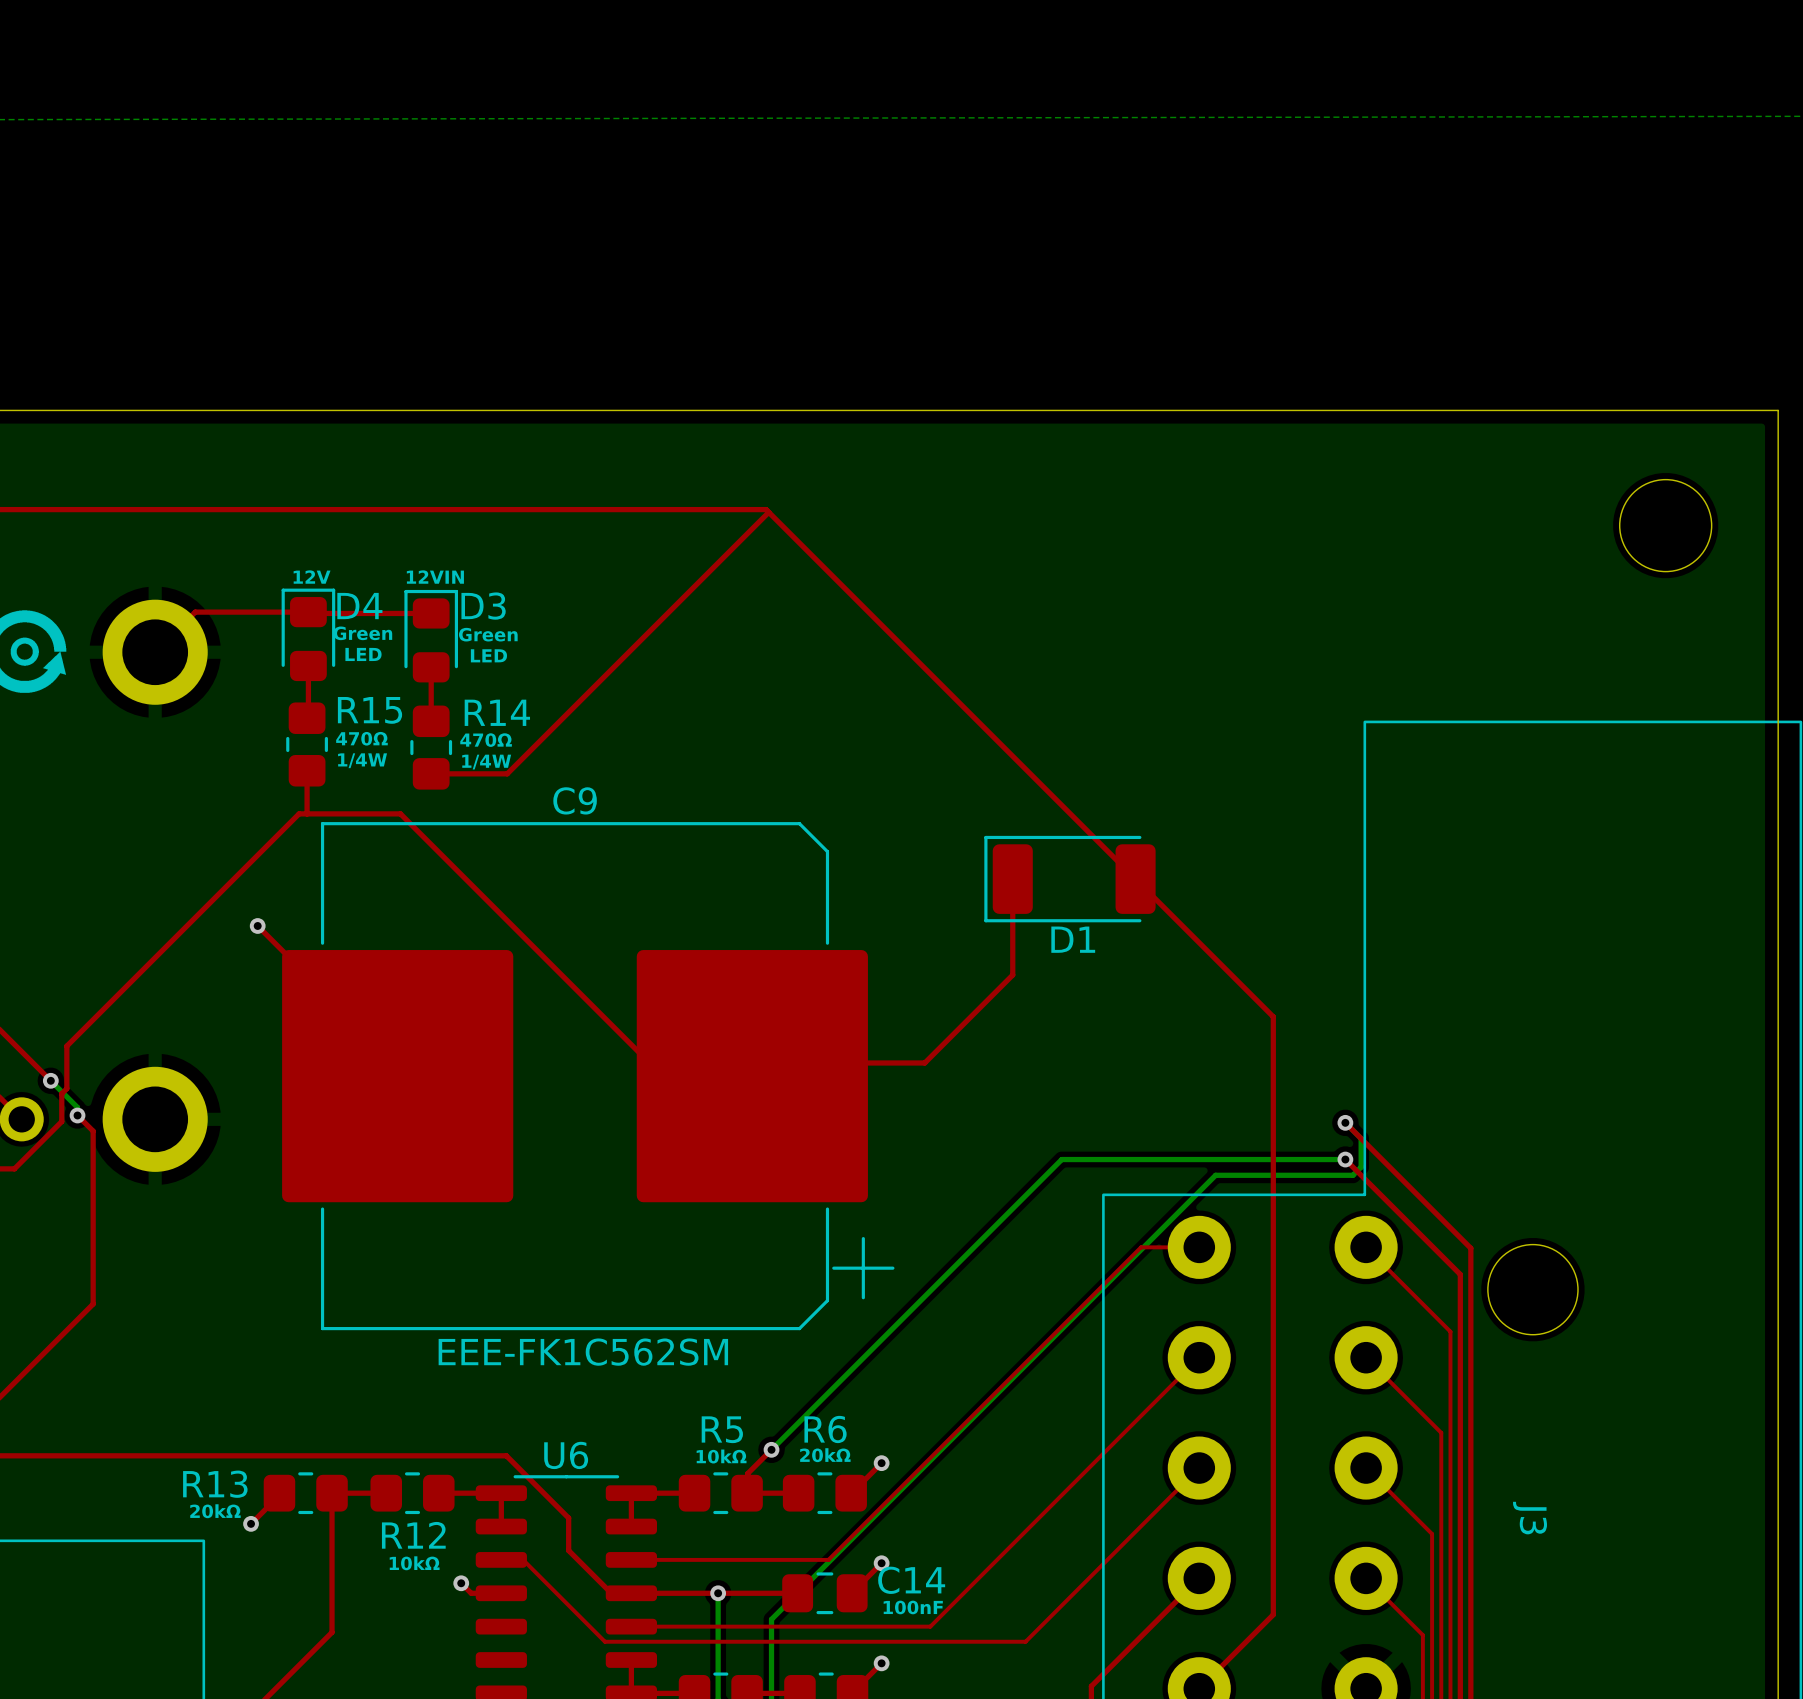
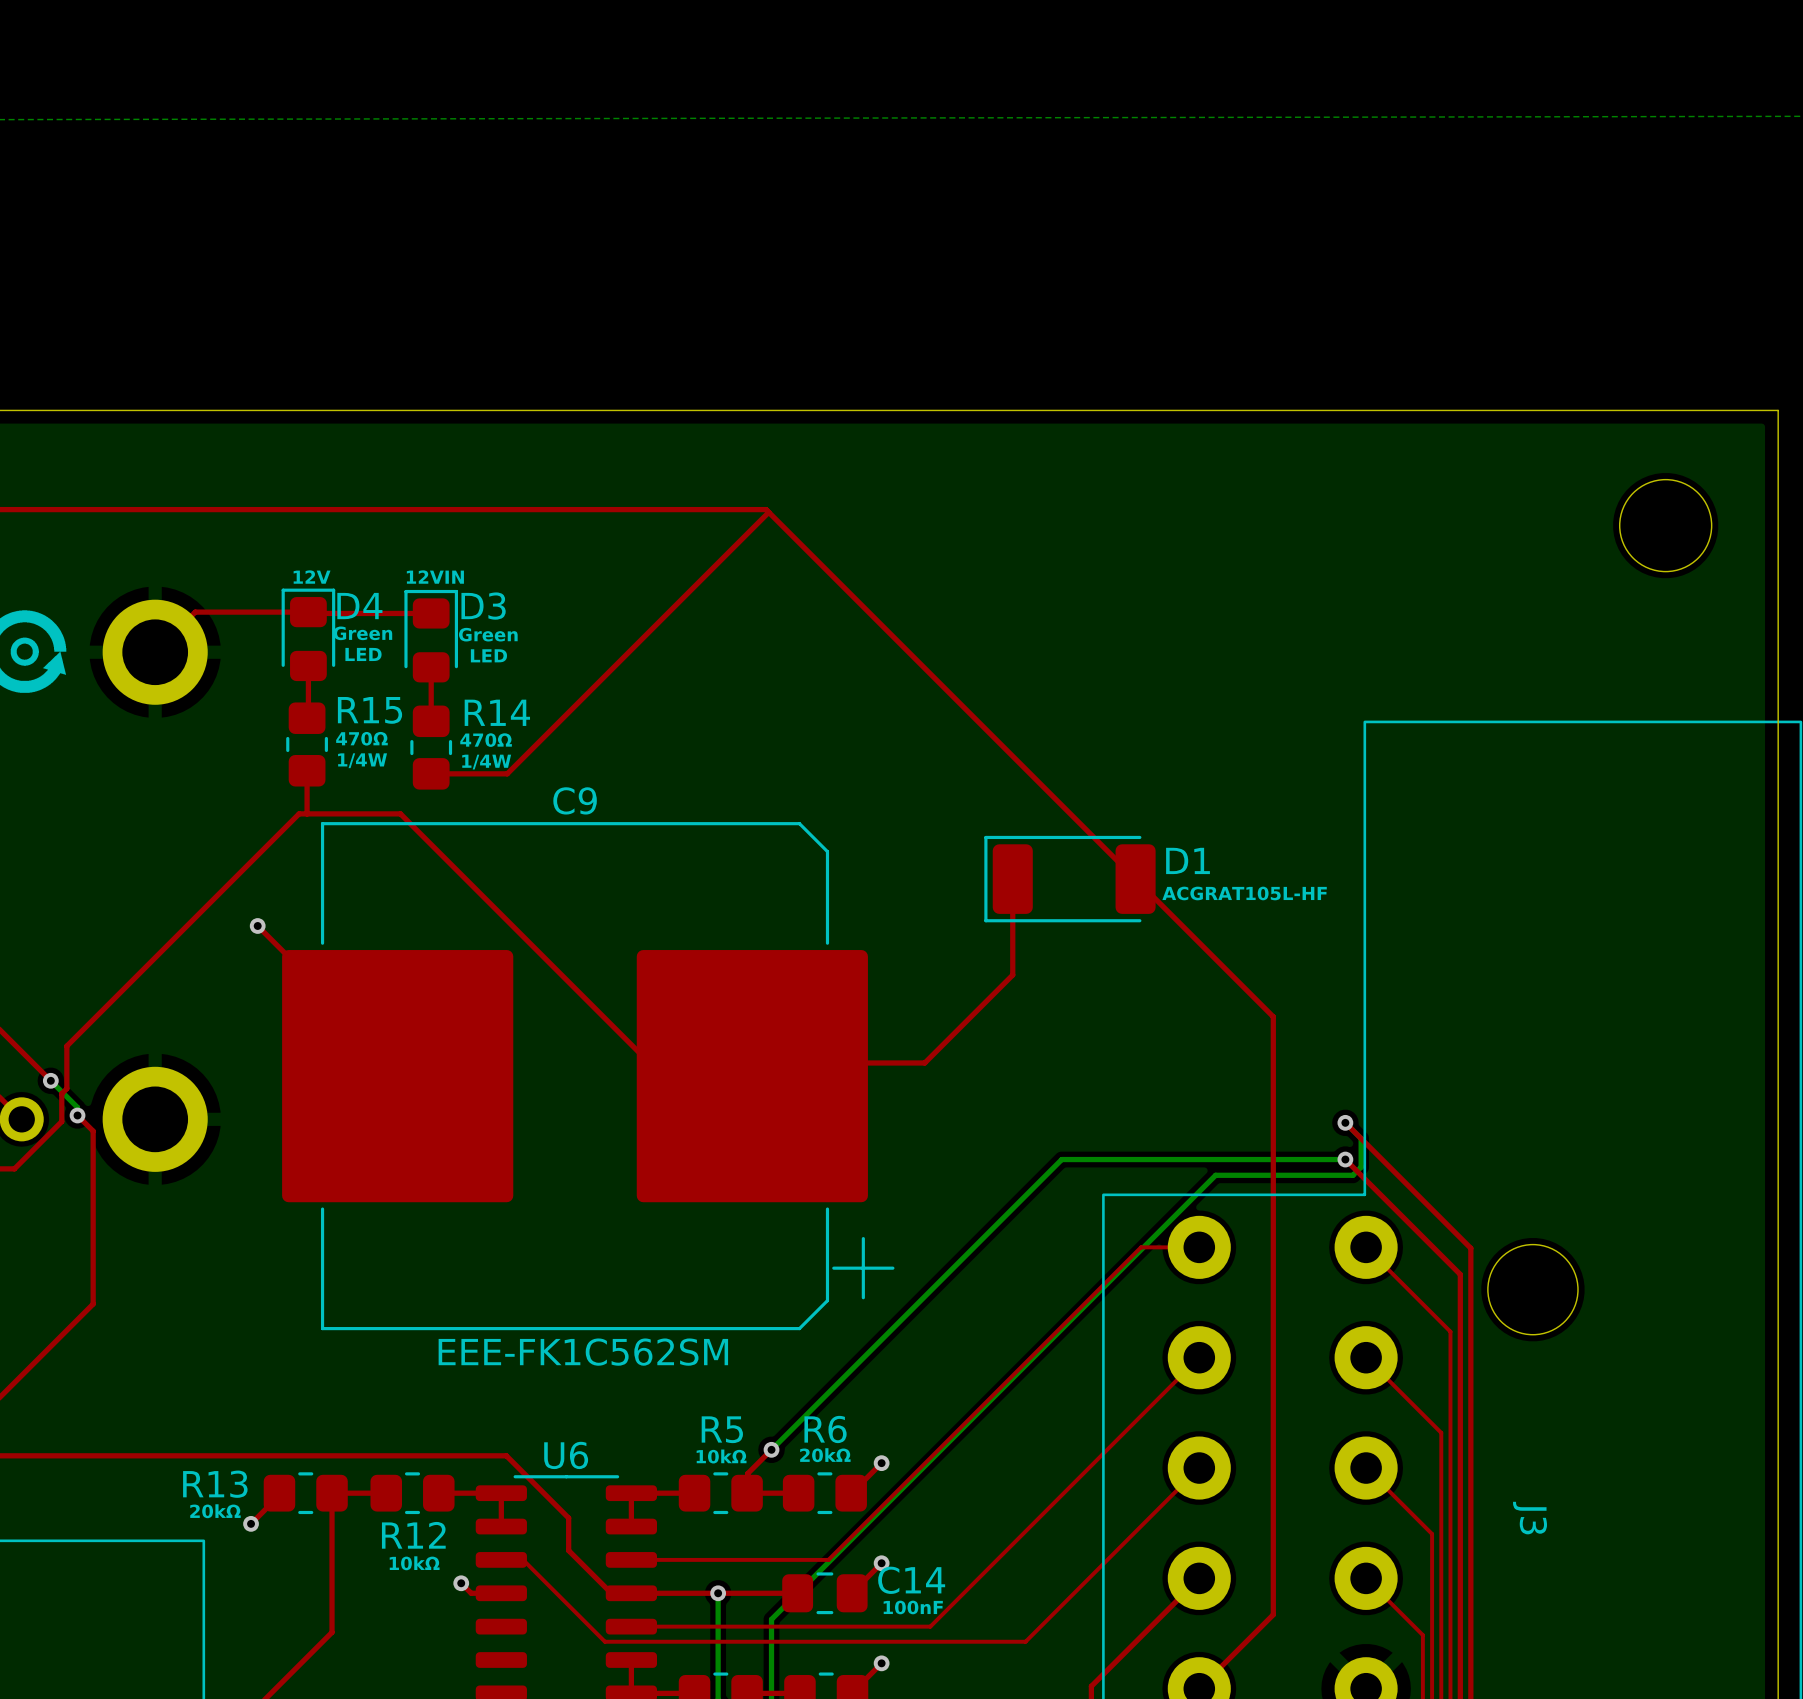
text: none -> ACGRAT105L-HF (1244, 893)
D1 name position: D1 (1073, 939) -> D1 (1188, 860)

